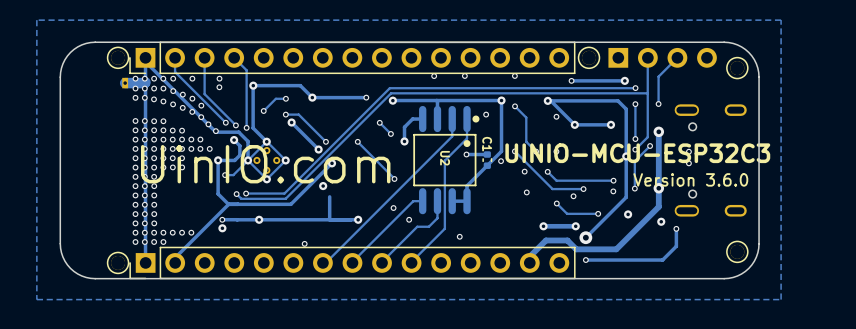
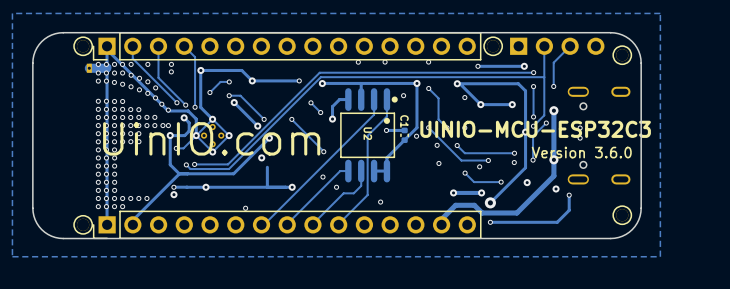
via: none -> (168, 125)

